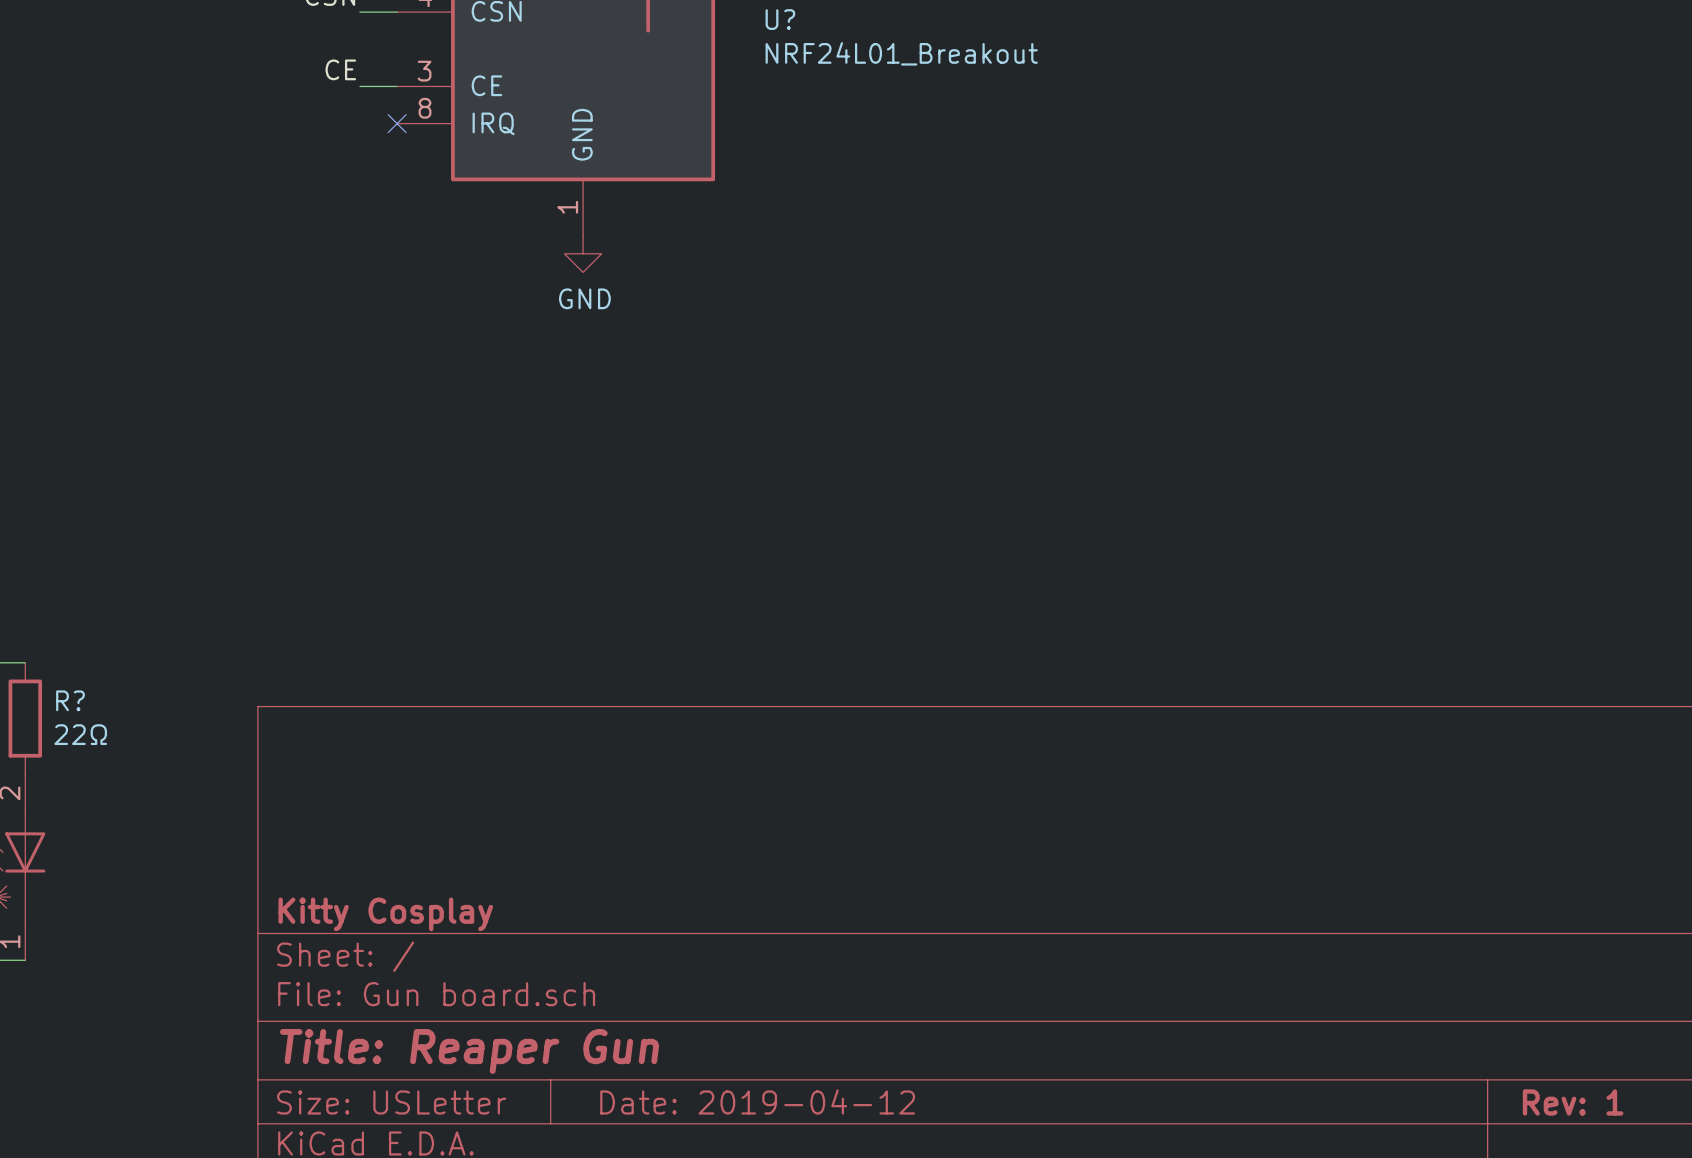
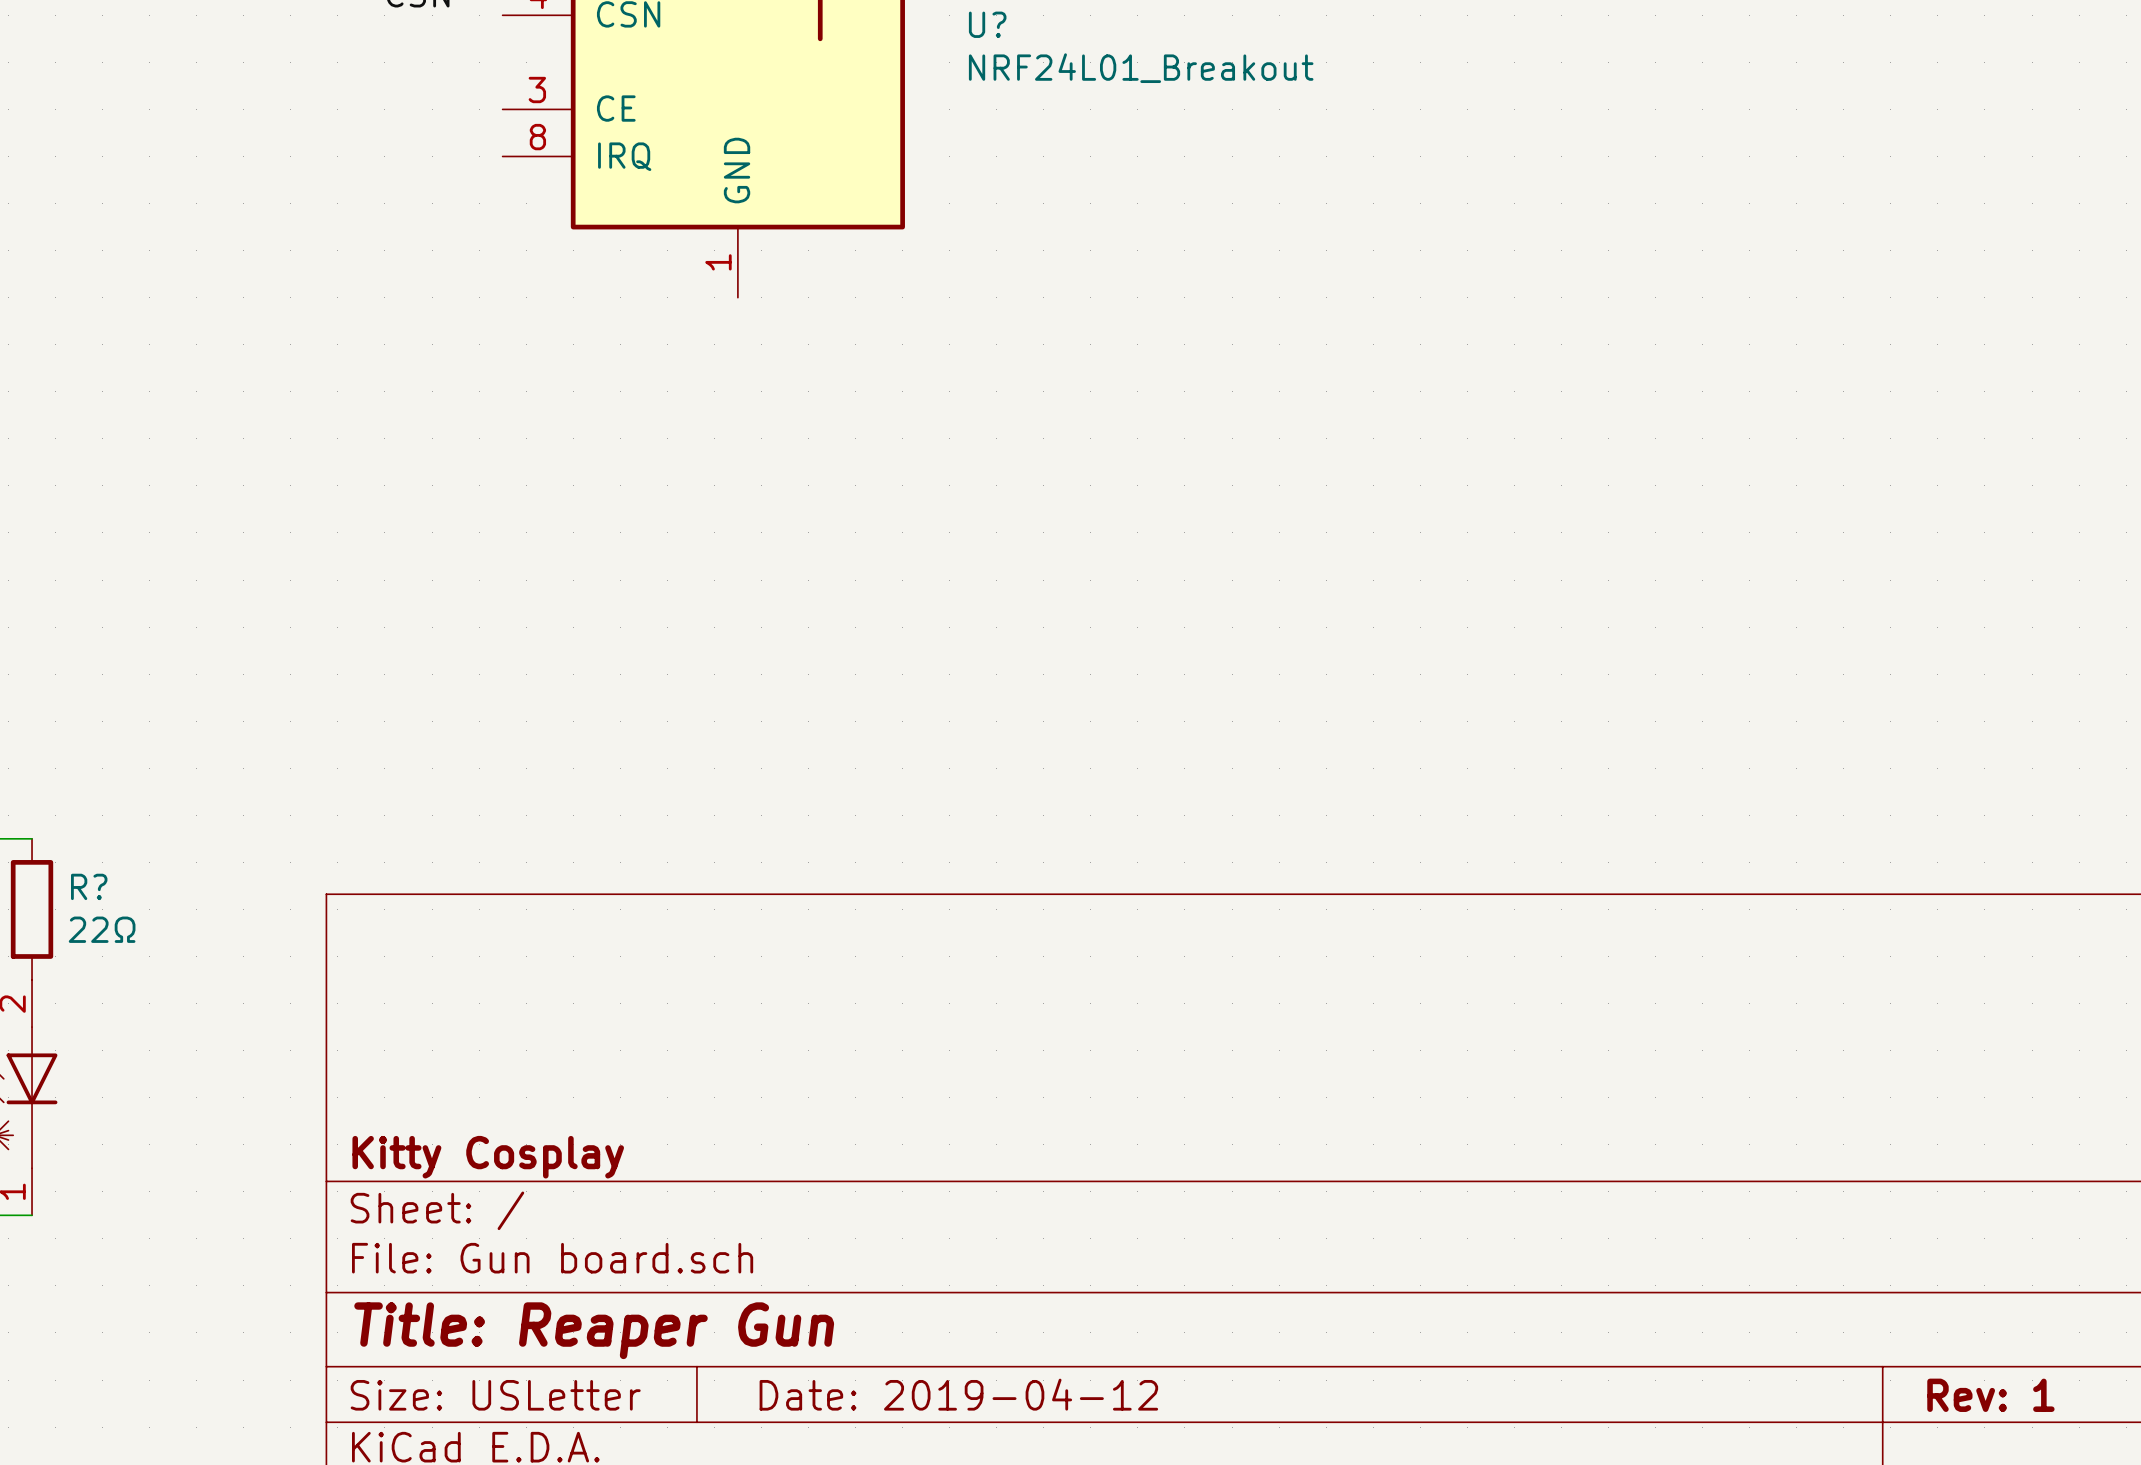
wire: (359, 12) (397, 12) -> none
label: CE (340, 69) -> none
wire: (359, 86) (397, 86) -> none
no-connect mark: (397, 123) -> none
power symbol: GND (583, 253) -> none

